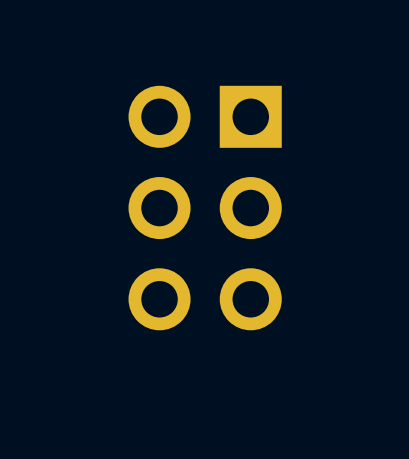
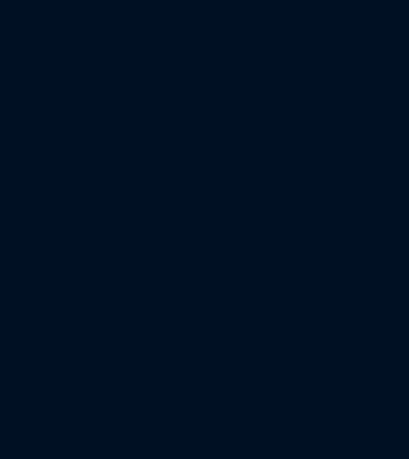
part: (205, 208) -> none

